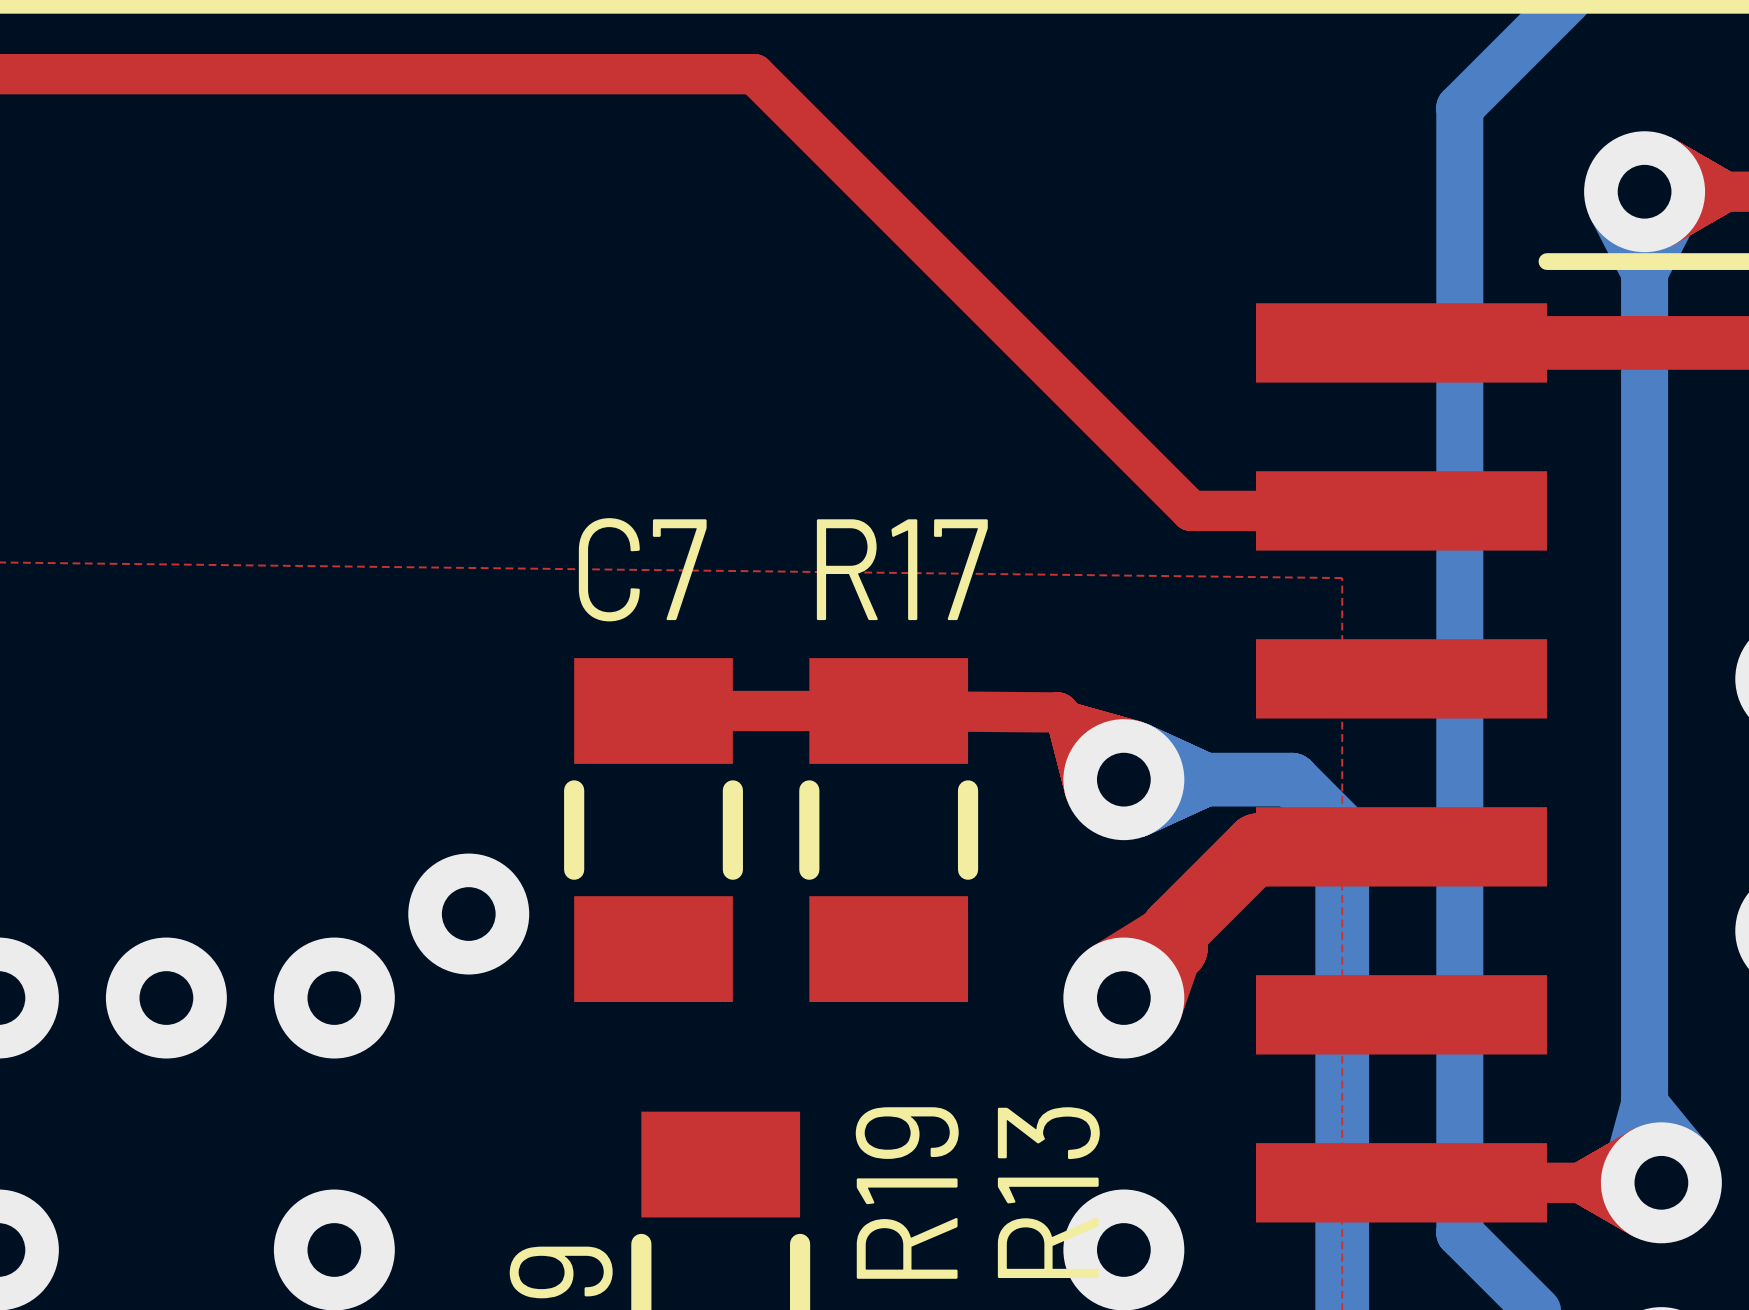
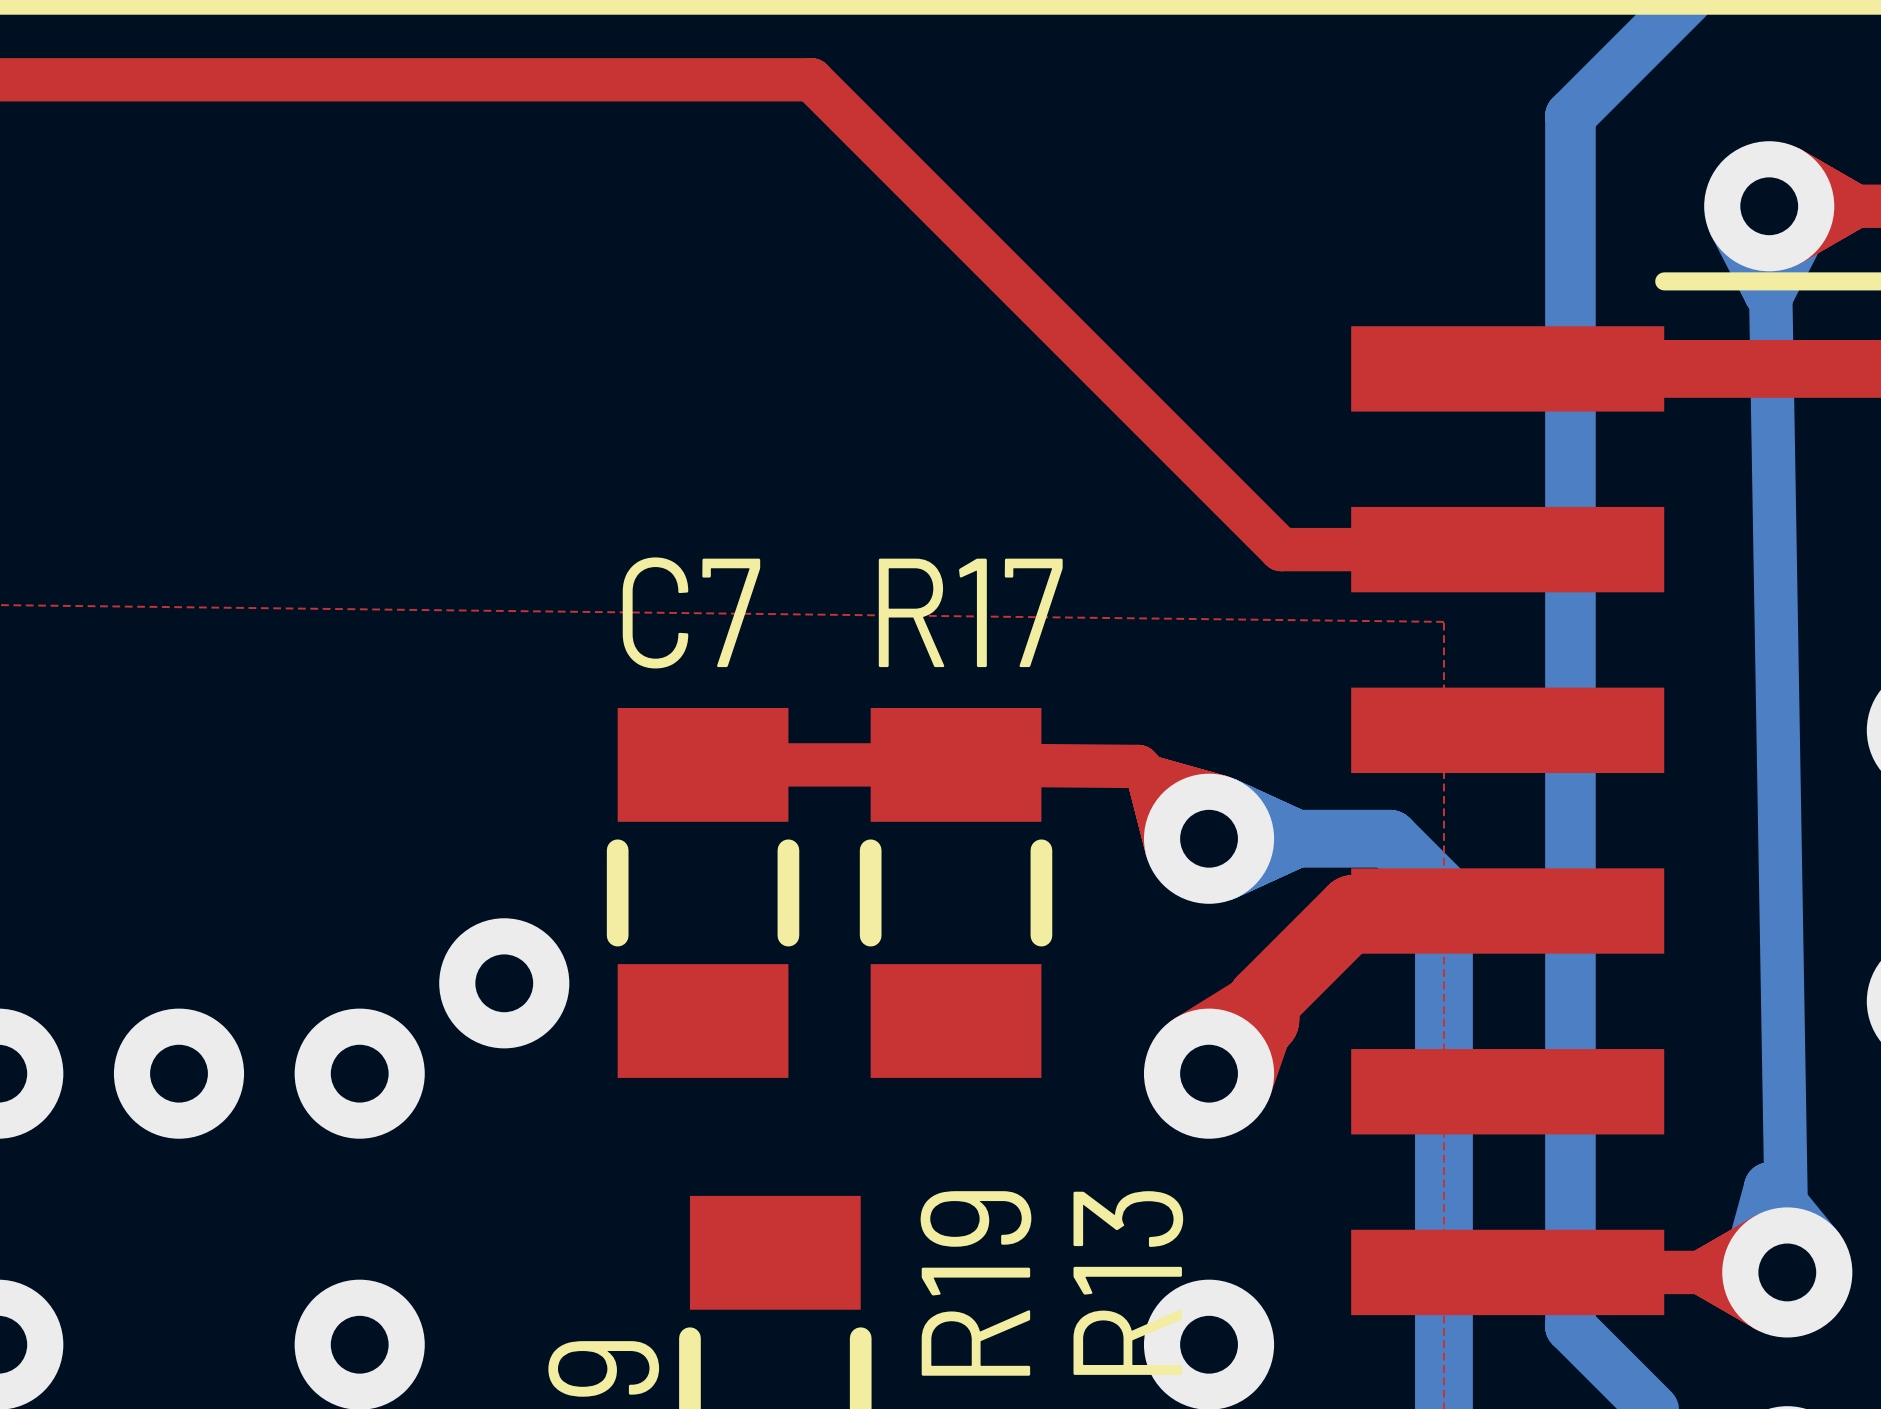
bottom track: (1644, 191) (1644, 1166) (1661, 1182) -> (1769, 206) (1787, 1272)

